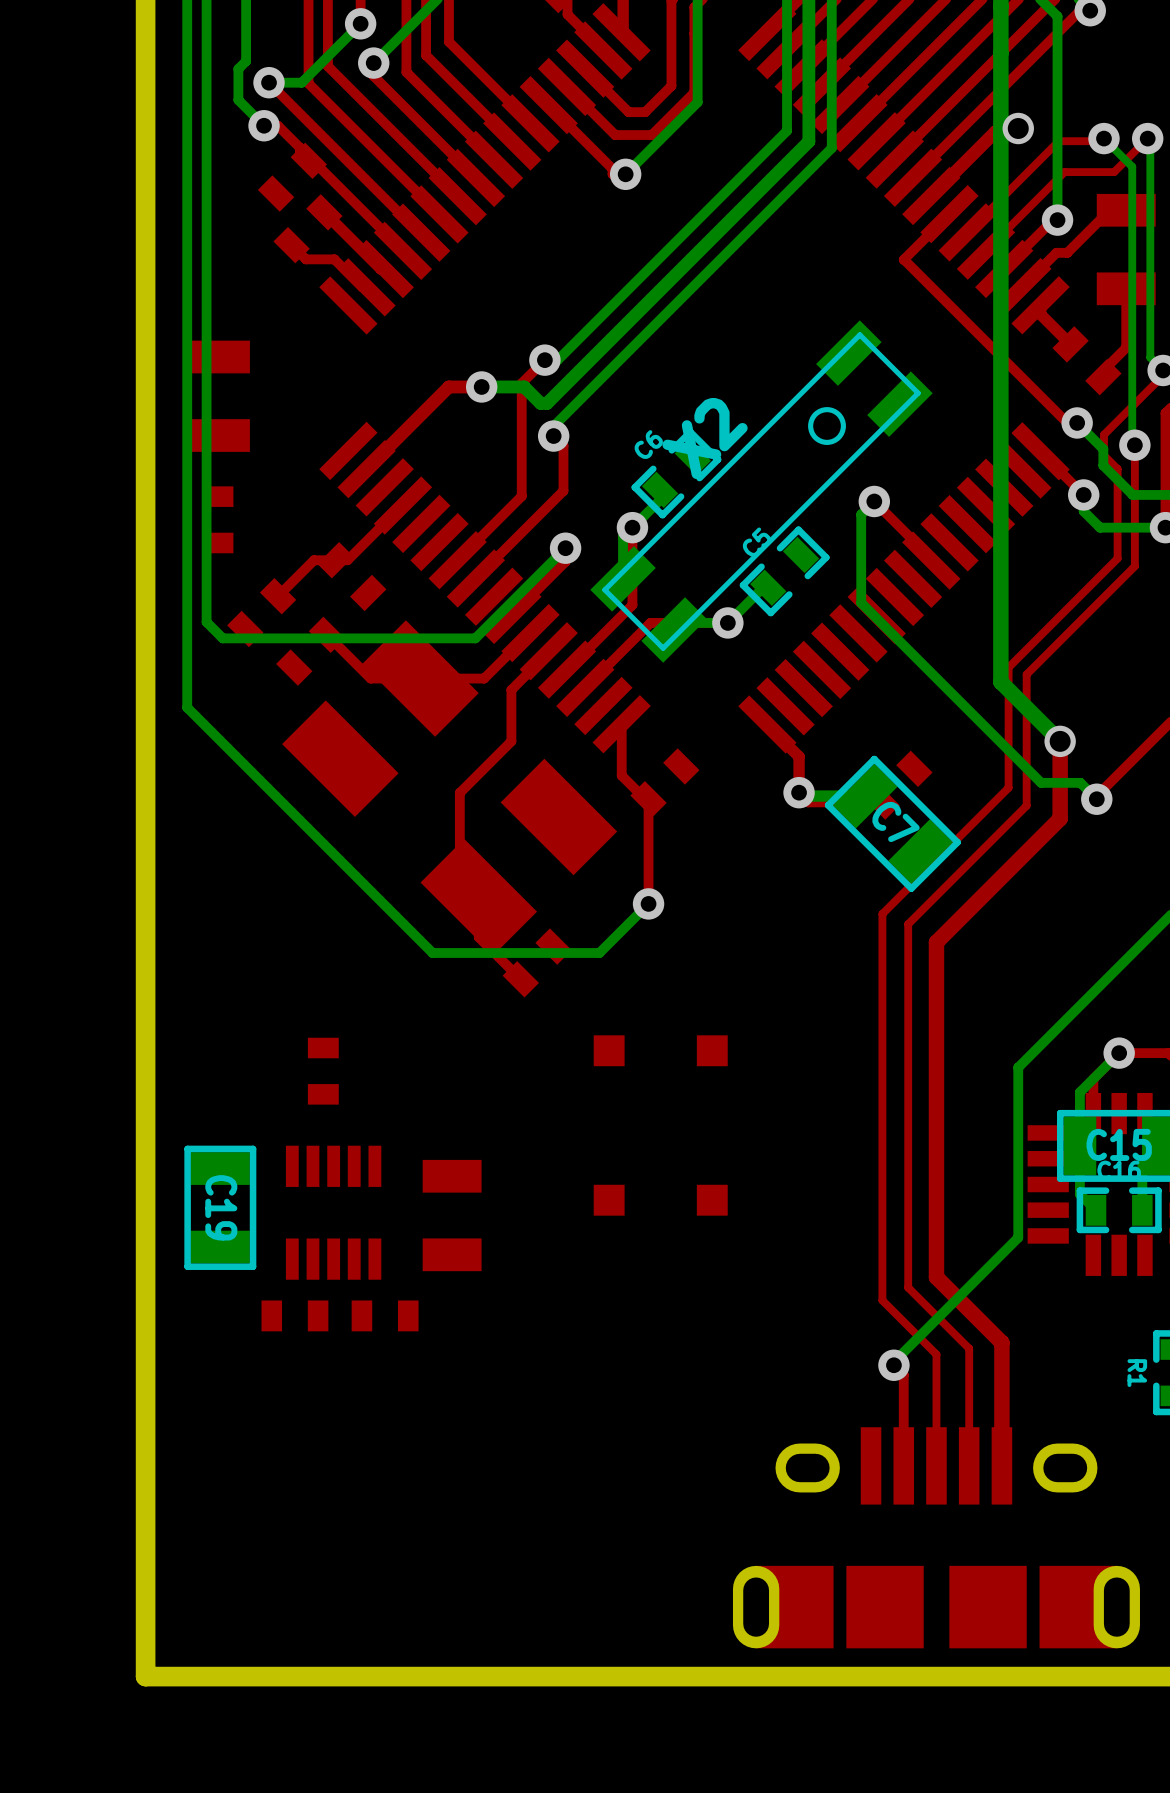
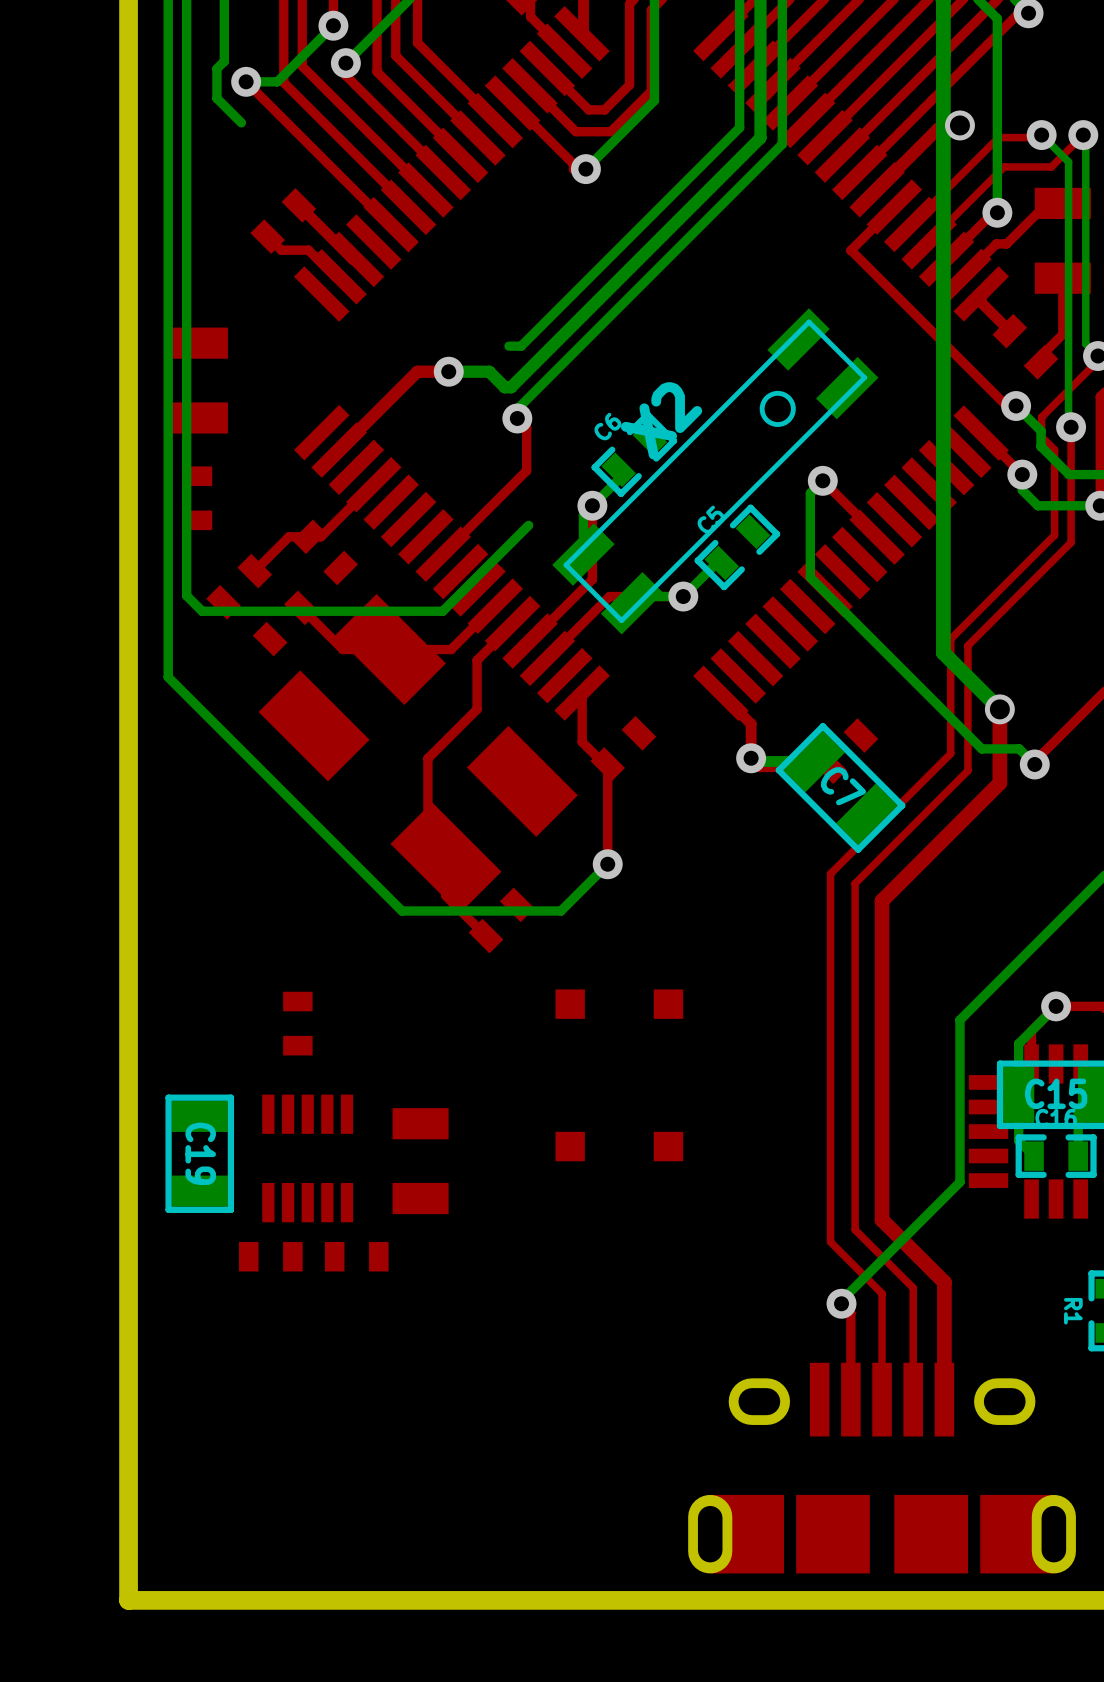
top track: (264, 125) (277, 125) (403, 250) -> none
via: (264, 125) -> none
part: (292, 177) -> none
top track: (544, 360) (521, 383) (521, 496) (457, 560) -> none
via: (544, 360) -> none
top track: (565, 548) (565, 561) (512, 614) -> none
via: (565, 548) -> none

